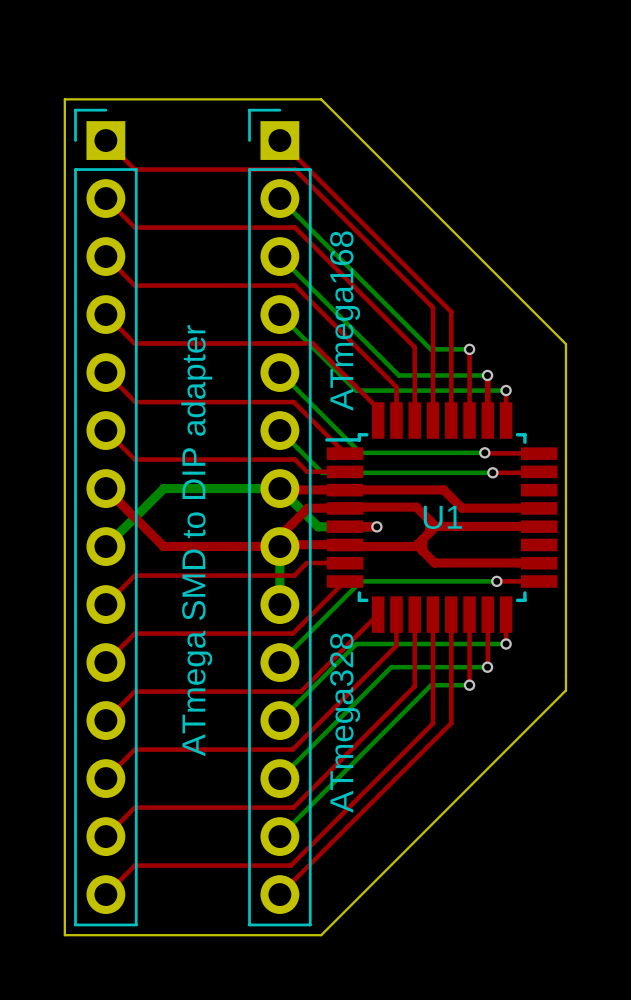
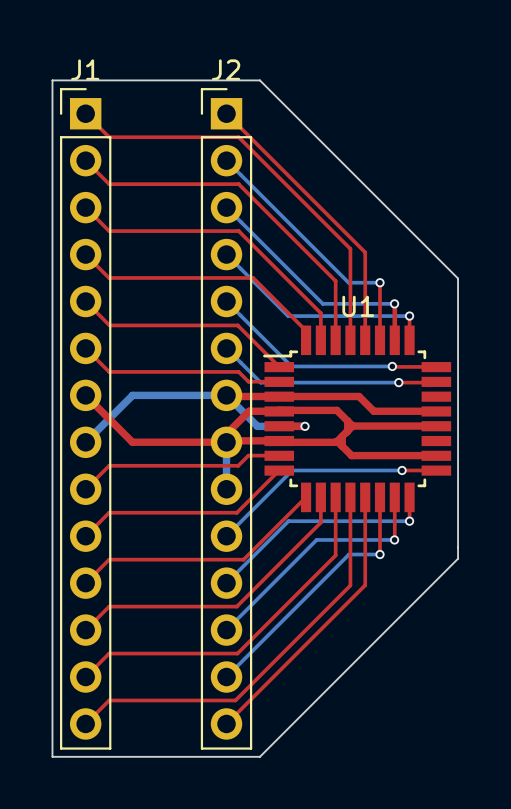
J1 name: none -> J1 (85, 69)
J2 name: none -> J2 (226, 69)
text: ATmega168 (345, 321) -> none
U1 name position: U1 (442, 517) -> U1 (358, 306)
text: ATmega SMD to DIP adapter (196, 540) -> none
text: ATmega328 (345, 723) -> none

